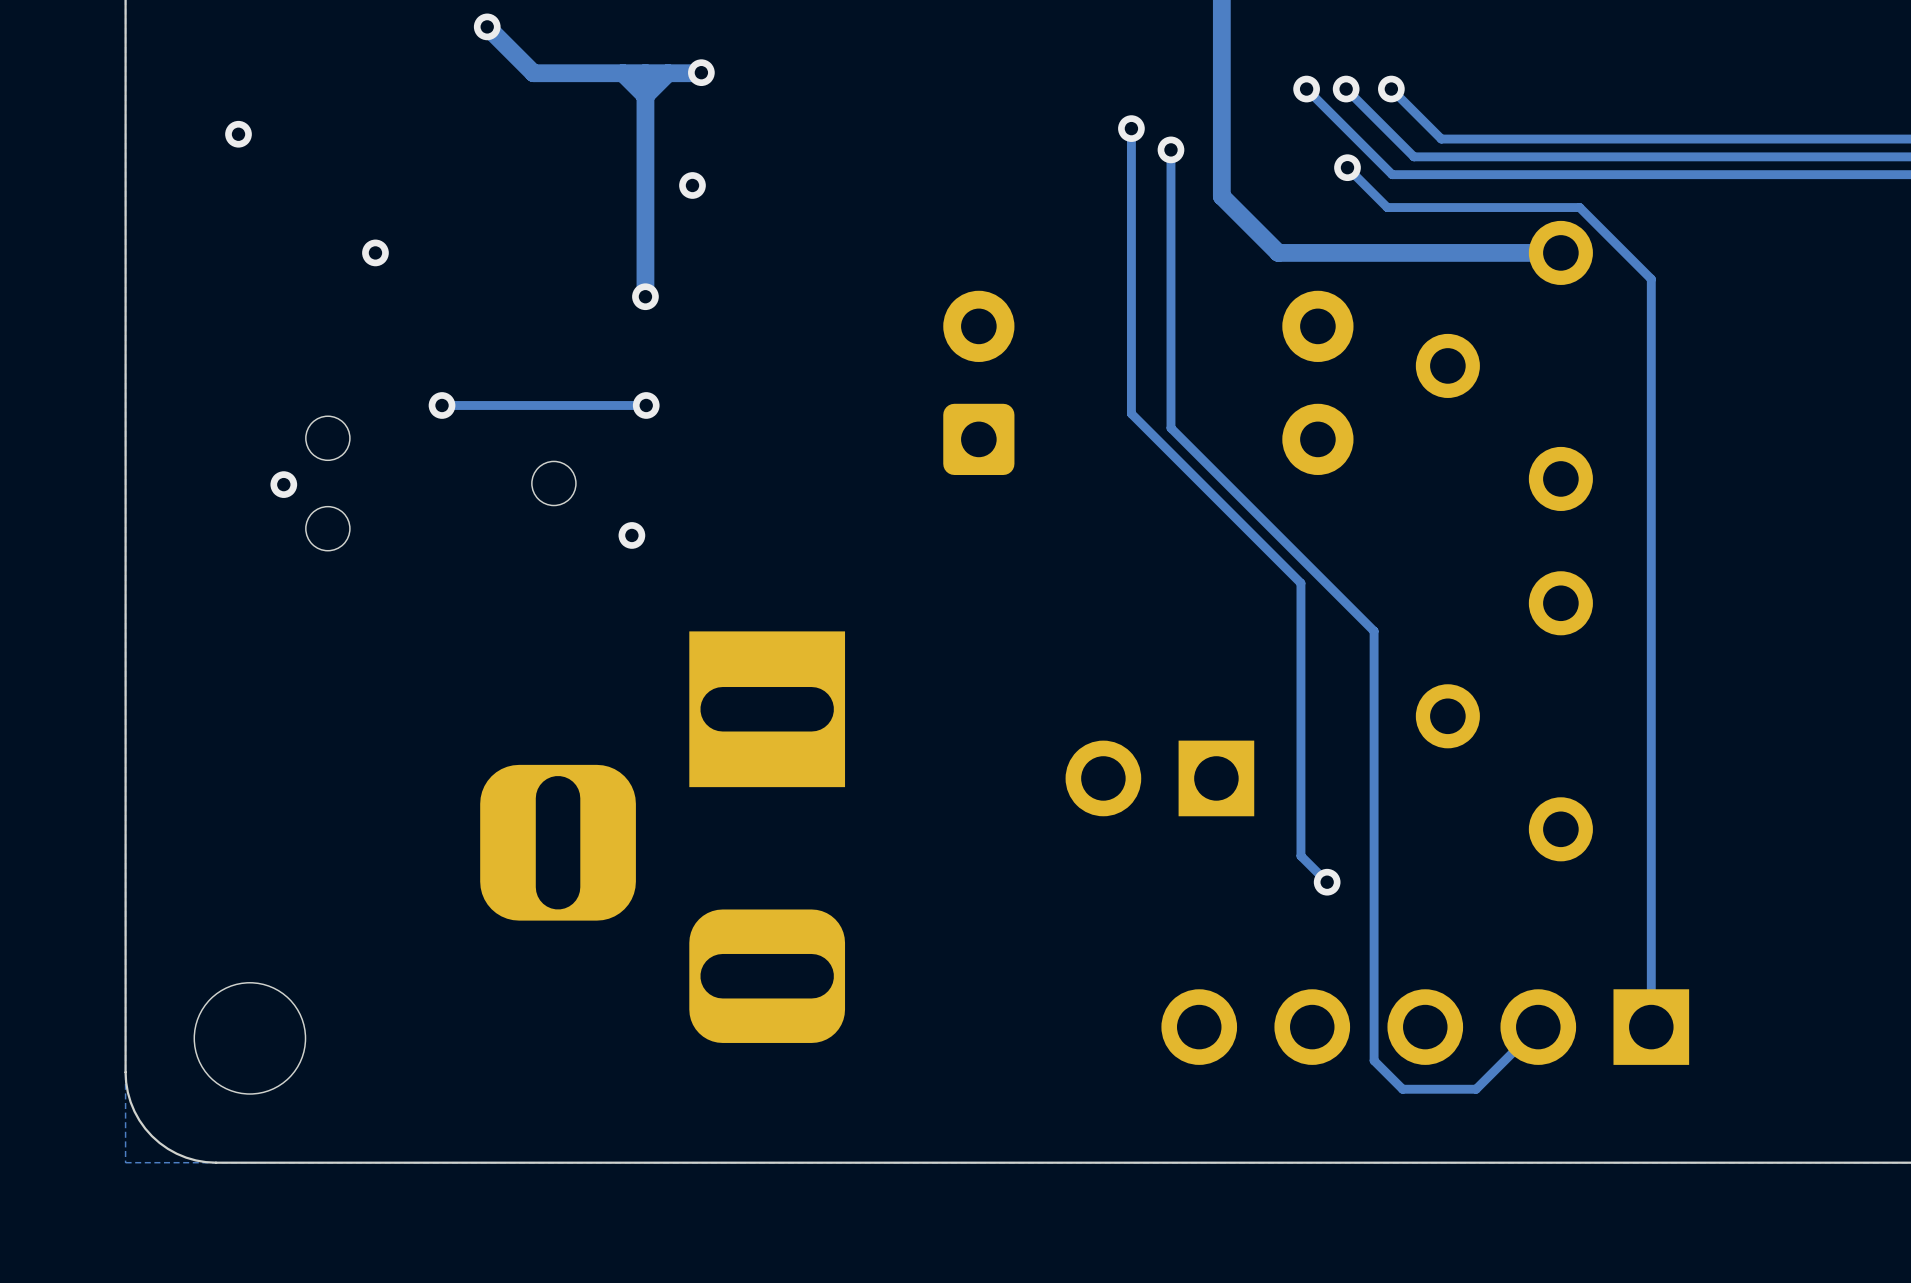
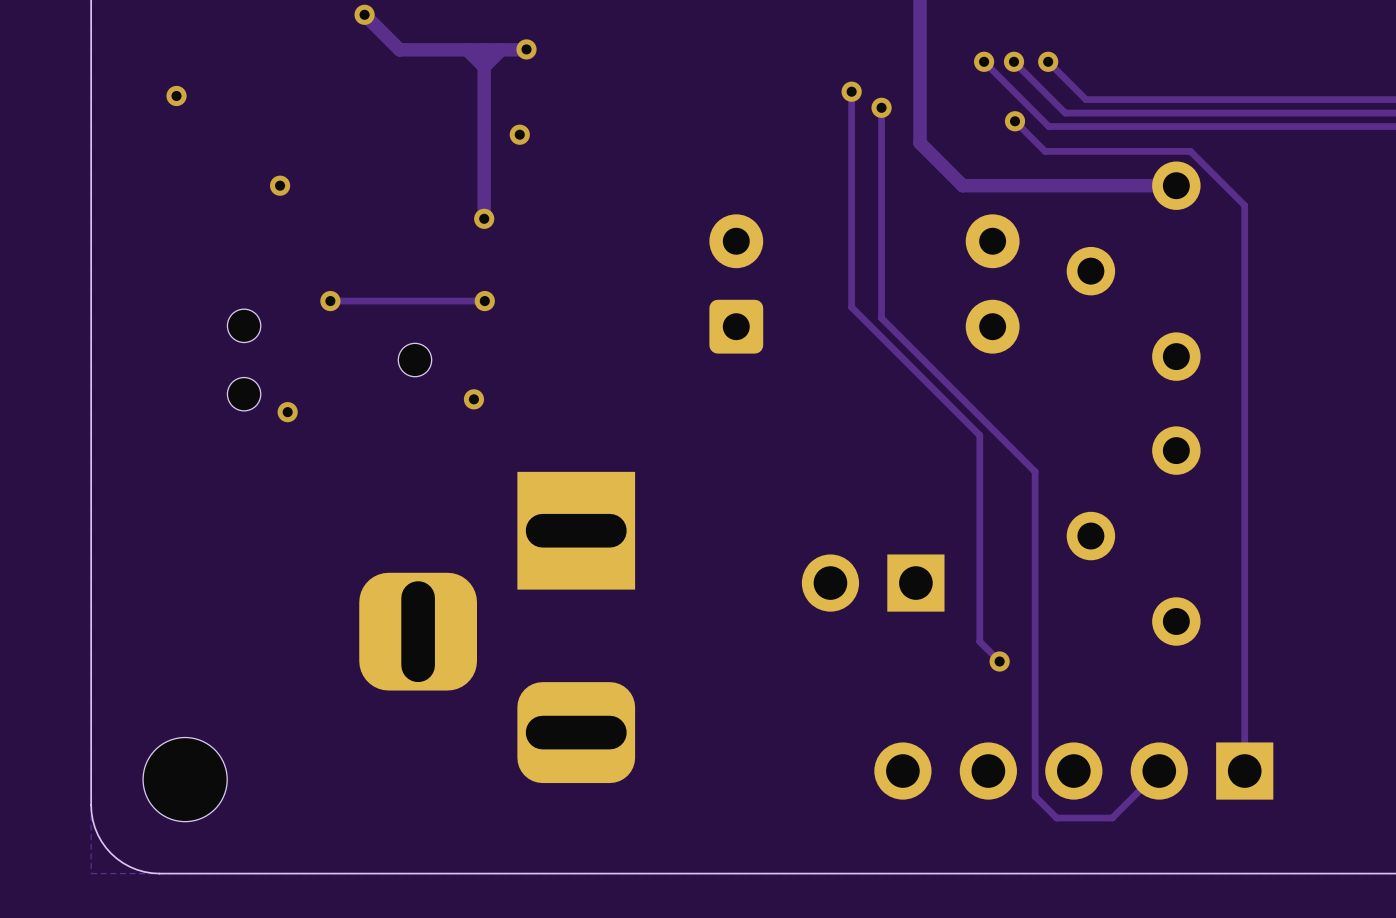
via position: (283, 484) -> (287, 412)

